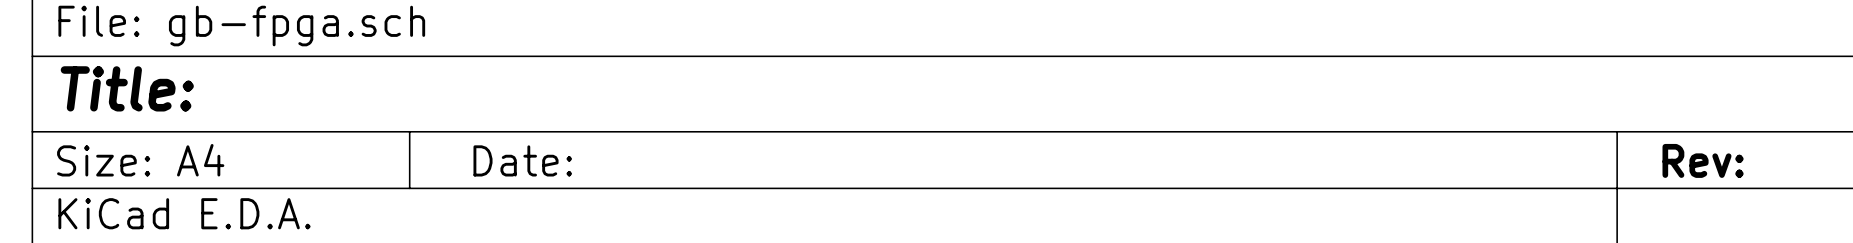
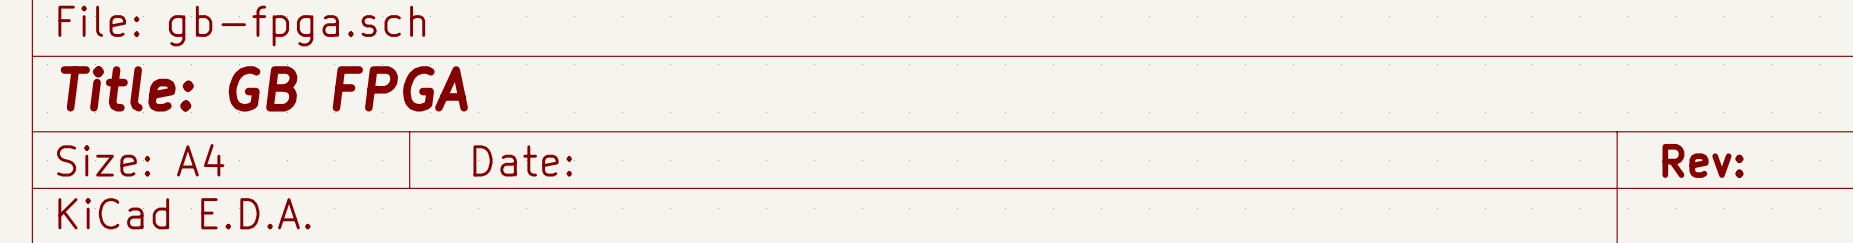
title block: Title: (127, 88) -> Title: GB FPGA (264, 88)

